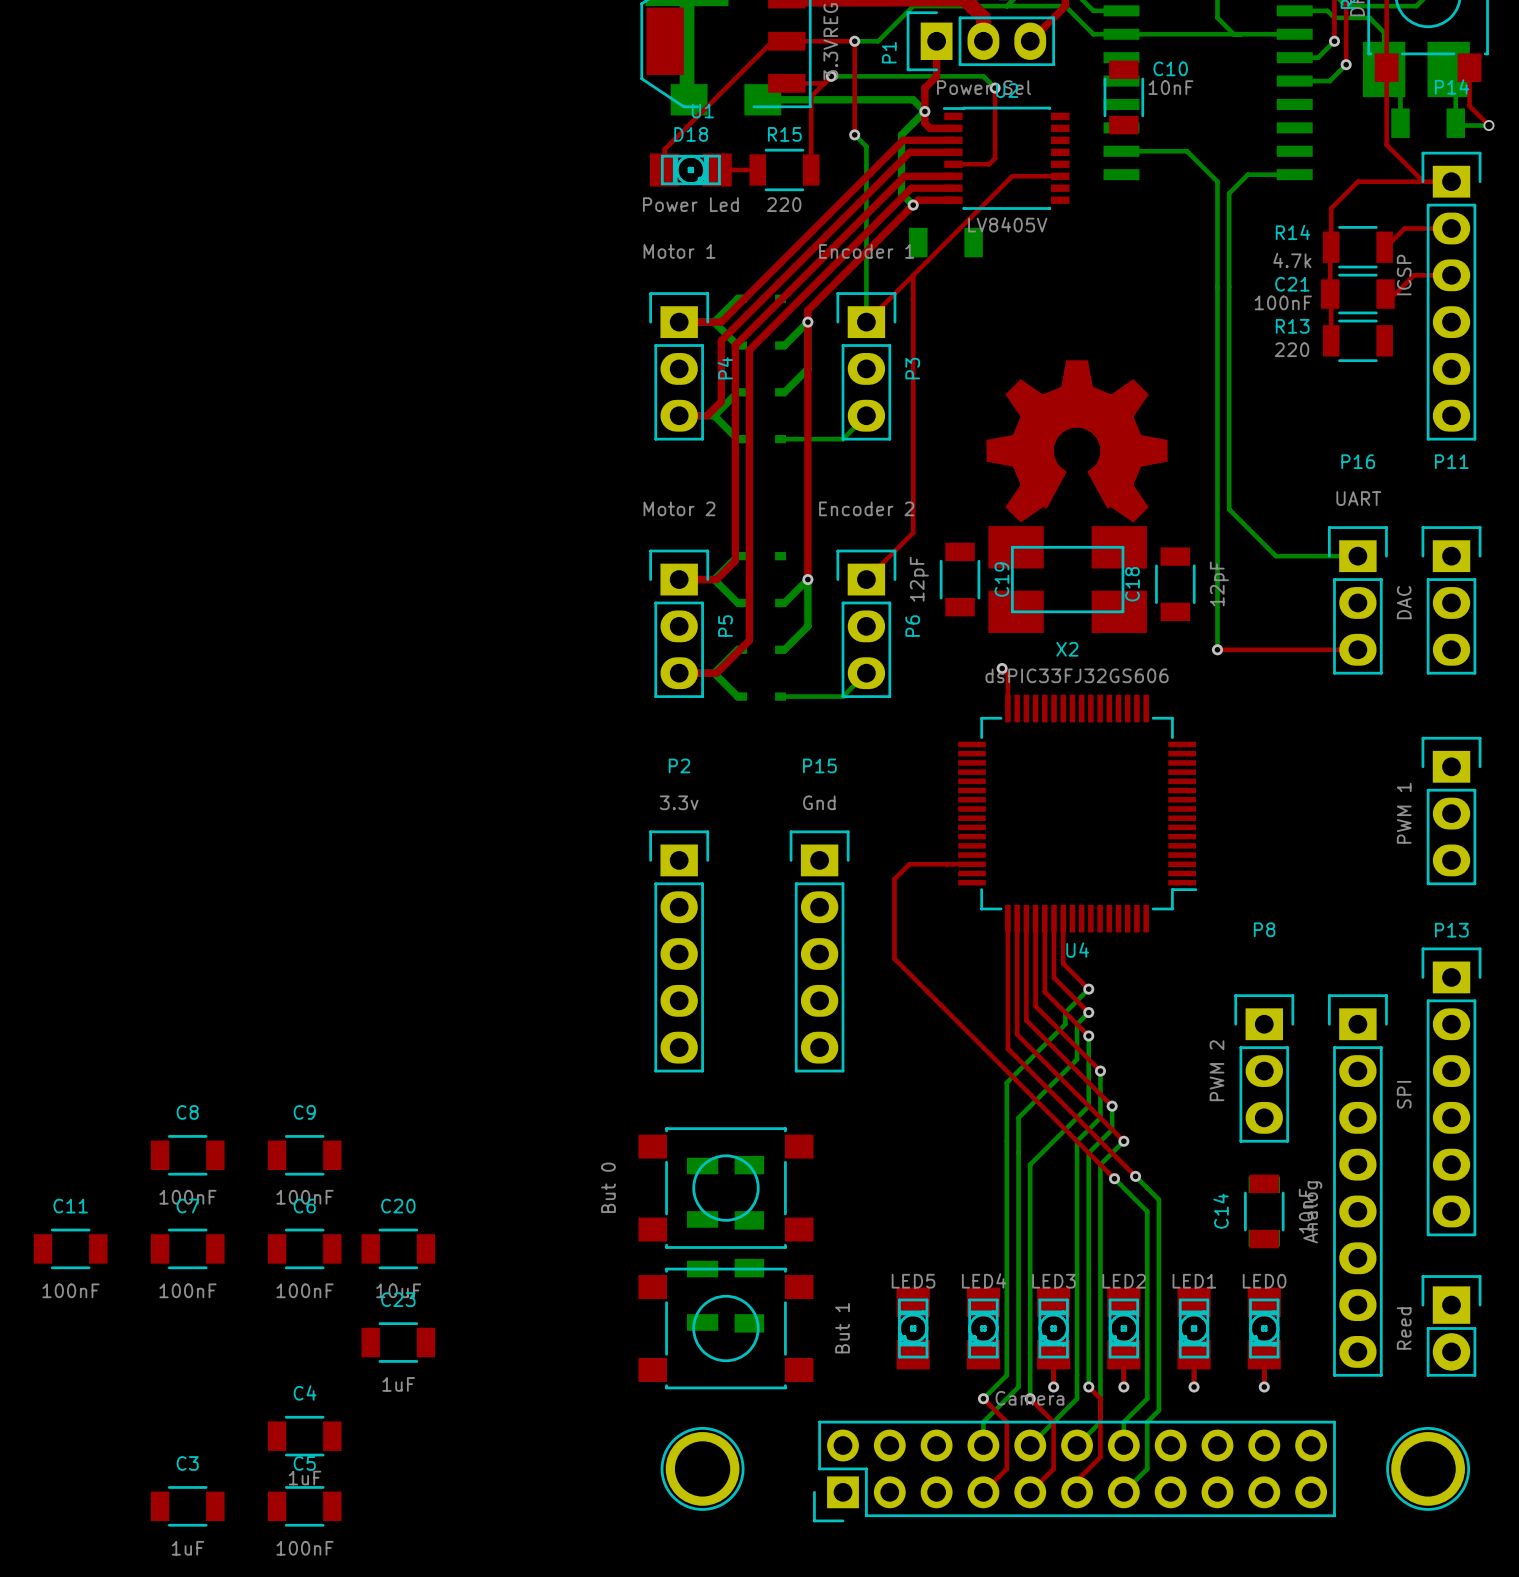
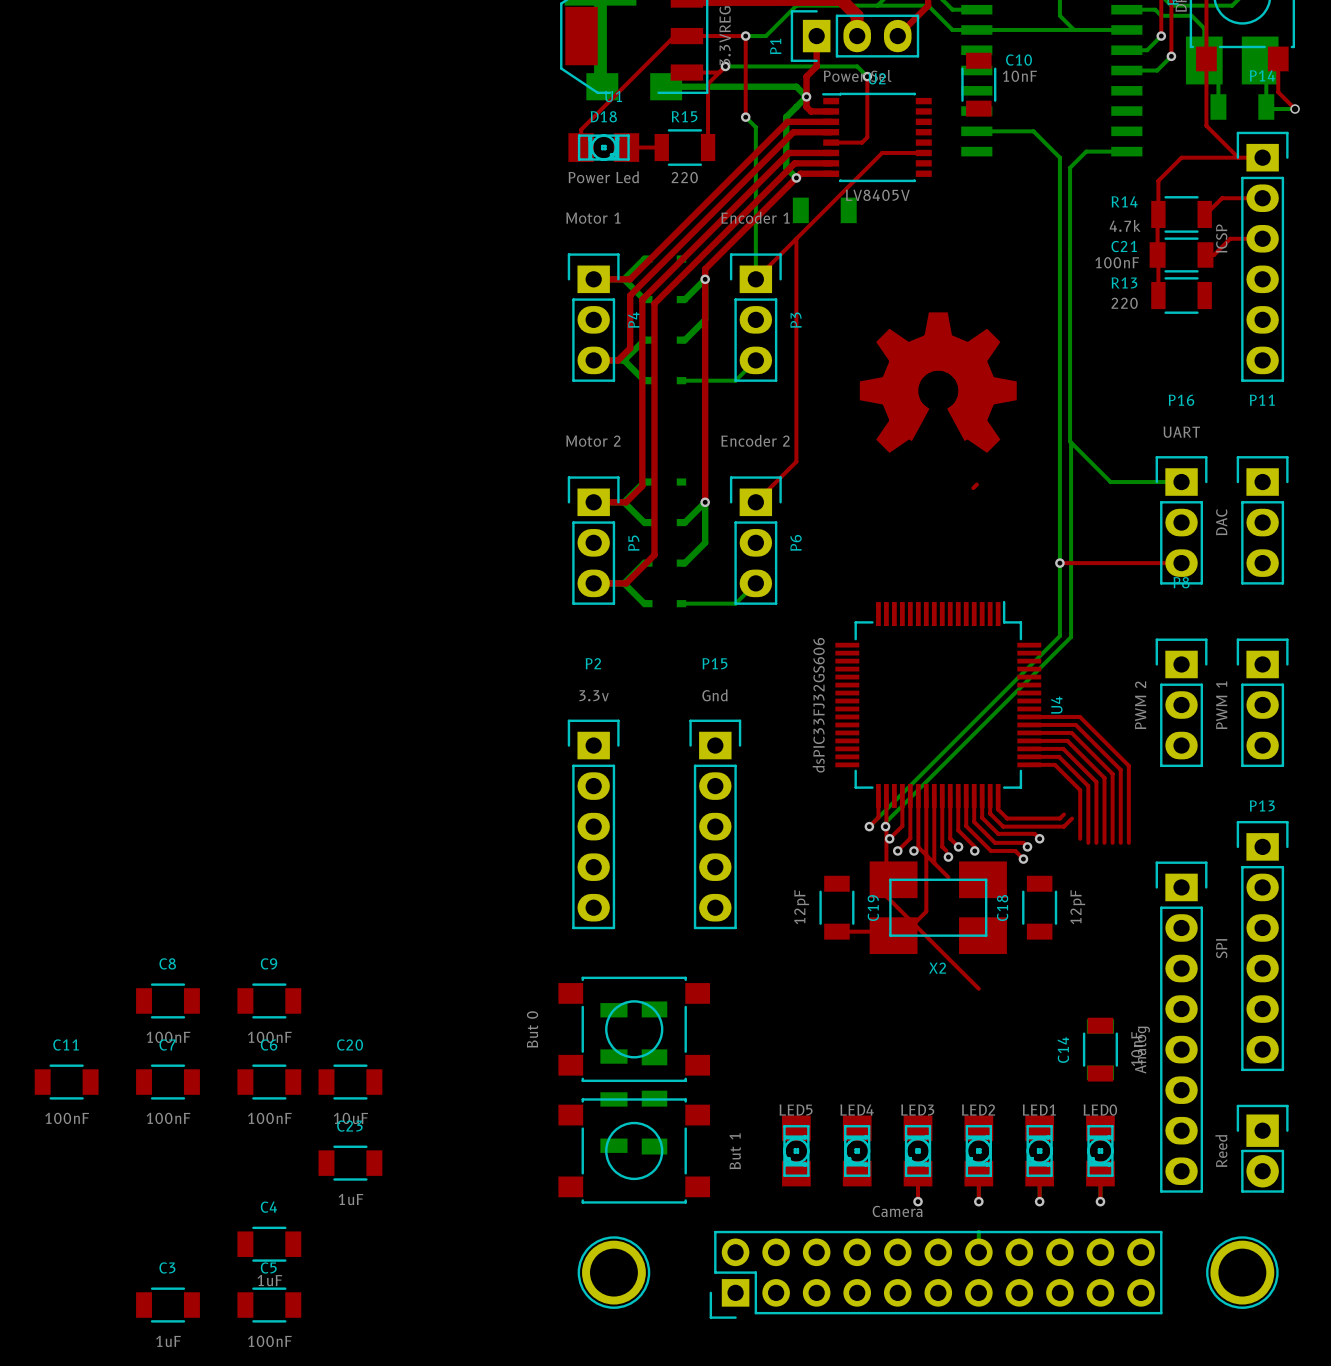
bottom track: none -> (1071, 442) (1071, 637) (885, 822) (885, 826)
C19 position: (960, 579) -> (836, 907)
X2 position: (1067, 579) -> (938, 907)
C18 position: (1175, 584) -> (1039, 907)
bottom track: none -> (1059, 563) (1059, 636) (869, 826)
top track: (1002, 668) (1007, 674) (1007, 708) -> none
via: (1002, 668) -> none
U4 rotation: 0° (1077, 813) -> 90° counterclockwise (938, 704)
top track: none -> (1029, 716) (1080, 716) (1128, 765) (1128, 842)
top track: none -> (1029, 724) (1075, 724) (1120, 769) (1120, 842)
top track: none -> (1029, 732) (1071, 732) (1112, 773) (1112, 842)
top track: none -> (1029, 740) (1067, 740) (1104, 777) (1104, 842)
top track: (972, 864) (909, 864) (894, 879) (894, 958) (1114, 1178) -> none
top track: none -> (1029, 748) (1063, 748) (1096, 782) (1096, 842)
top track: none -> (1029, 756) (1059, 756) (1088, 786) (1088, 842)
top track: none -> (1029, 764) (1054, 764) (1080, 790) (1080, 838)
top track: (1026, 918) (1026, 1020) (1112, 1106) -> none
top track: none -> (934, 795) (934, 863)
top track: none -> (942, 795) (942, 846) (946, 850)
top track: none -> (950, 795) (950, 838) (958, 846)
top track: none -> (958, 795) (958, 830) (974, 846) (974, 850)
top track: none -> (966, 795) (966, 826) (991, 850) (1015, 850) (1023, 859)
top track: none -> (974, 795) (974, 822) (995, 842) (1023, 842) (1027, 846)
top track: none -> (982, 795) (982, 817) (998, 833) (1034, 833) (1039, 838)
top track: none -> (990, 795) (990, 813) (1003, 826) (1063, 826) (1072, 818)
top track: none -> (998, 795) (998, 809) (1007, 818) (1059, 818) (1063, 814)
top track: (1007, 943) (1007, 1048) (1135, 1176) -> (878, 817) (869, 826)
top track: (1035, 953) (1035, 1006) (1100, 1071) -> (902, 826) (889, 838)
via: none -> (869, 826)
via: none -> (885, 826)
top track: (1063, 963) (1088, 989) -> (926, 834) (926, 911) (902, 935) (893, 935) (889, 931) (836, 931)
top track: (1044, 967) (1044, 991) (1088, 1035) -> (910, 838) (897, 850)
via: none -> (889, 838)
via: none -> (1039, 838)
via: none -> (958, 846)
via: none -> (1027, 846)
via: none -> (897, 850)
via: none -> (913, 850)
via: none -> (974, 850)
bottom track: (1088, 989) (1065, 1012) (1065, 1024) (1006, 1082) (1006, 1375) (983, 1398) -> none
via: none -> (1023, 859)
bottom track: (1088, 1012) (1077, 1024) (1077, 1059) (1018, 1117) (1018, 1387) (983, 1422) (983, 1445) -> none
via: (1088, 1012) -> none
bottom track: (1088, 1035) (1088, 1106) (1030, 1164) (1030, 1398) -> none
via: (1088, 1035) -> none
P8 position: (1264, 1068) -> (1181, 702)
bottom track: (1100, 1071) (1100, 1117) (1077, 1141) (1077, 1398) (1030, 1445) -> none
via: (1100, 1071) -> none
bottom track: (1112, 1106) (1112, 1129) (1088, 1152) (1088, 1387) -> none
via: (1112, 1106) -> none
bottom track: (1123, 1141) (1100, 1164) (1100, 1422) (1077, 1445) -> none
via: (1123, 1141) -> none
bottom track: (1135, 1176) (1158, 1199) (1158, 1410) (1147, 1422) (1147, 1468) (1123, 1492) -> none
via: (1135, 1176) -> none
bottom track: (1114, 1178) (1147, 1211) (1147, 1398) (1123, 1422) -> none
via: (1114, 1178) -> none
top track: (1088, 1387) (1100, 1398) (1100, 1457) (1077, 1480) -> none
via: (1088, 1387) -> none
top track: (983, 1398) (1006, 1422) (1006, 1468) (983, 1492) -> none
via: (983, 1398) -> none
top track: (1030, 1398) (1053, 1422) (1053, 1468) (1030, 1492) -> none
via: (1030, 1398) -> none

